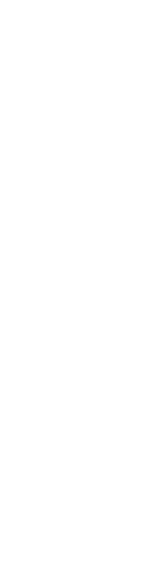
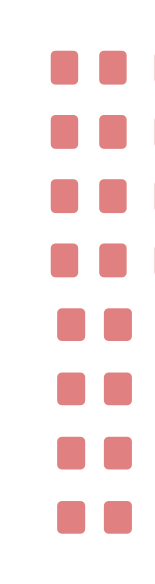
part: none -> (88, 67)
part: none -> (88, 131)
part: none -> (88, 196)
part: none -> (88, 260)
part: none -> (94, 324)
part: none -> (94, 388)
part: none -> (94, 453)
part: none -> (94, 517)

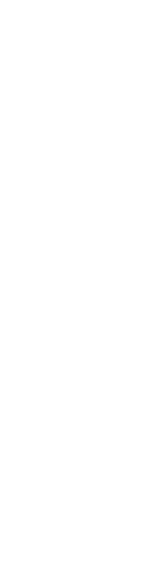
part: (88, 67) -> none
part: (88, 131) -> none
part: (88, 196) -> none
part: (88, 260) -> none
part: (94, 324) -> none
part: (94, 388) -> none
part: (94, 453) -> none
part: (94, 517) -> none

